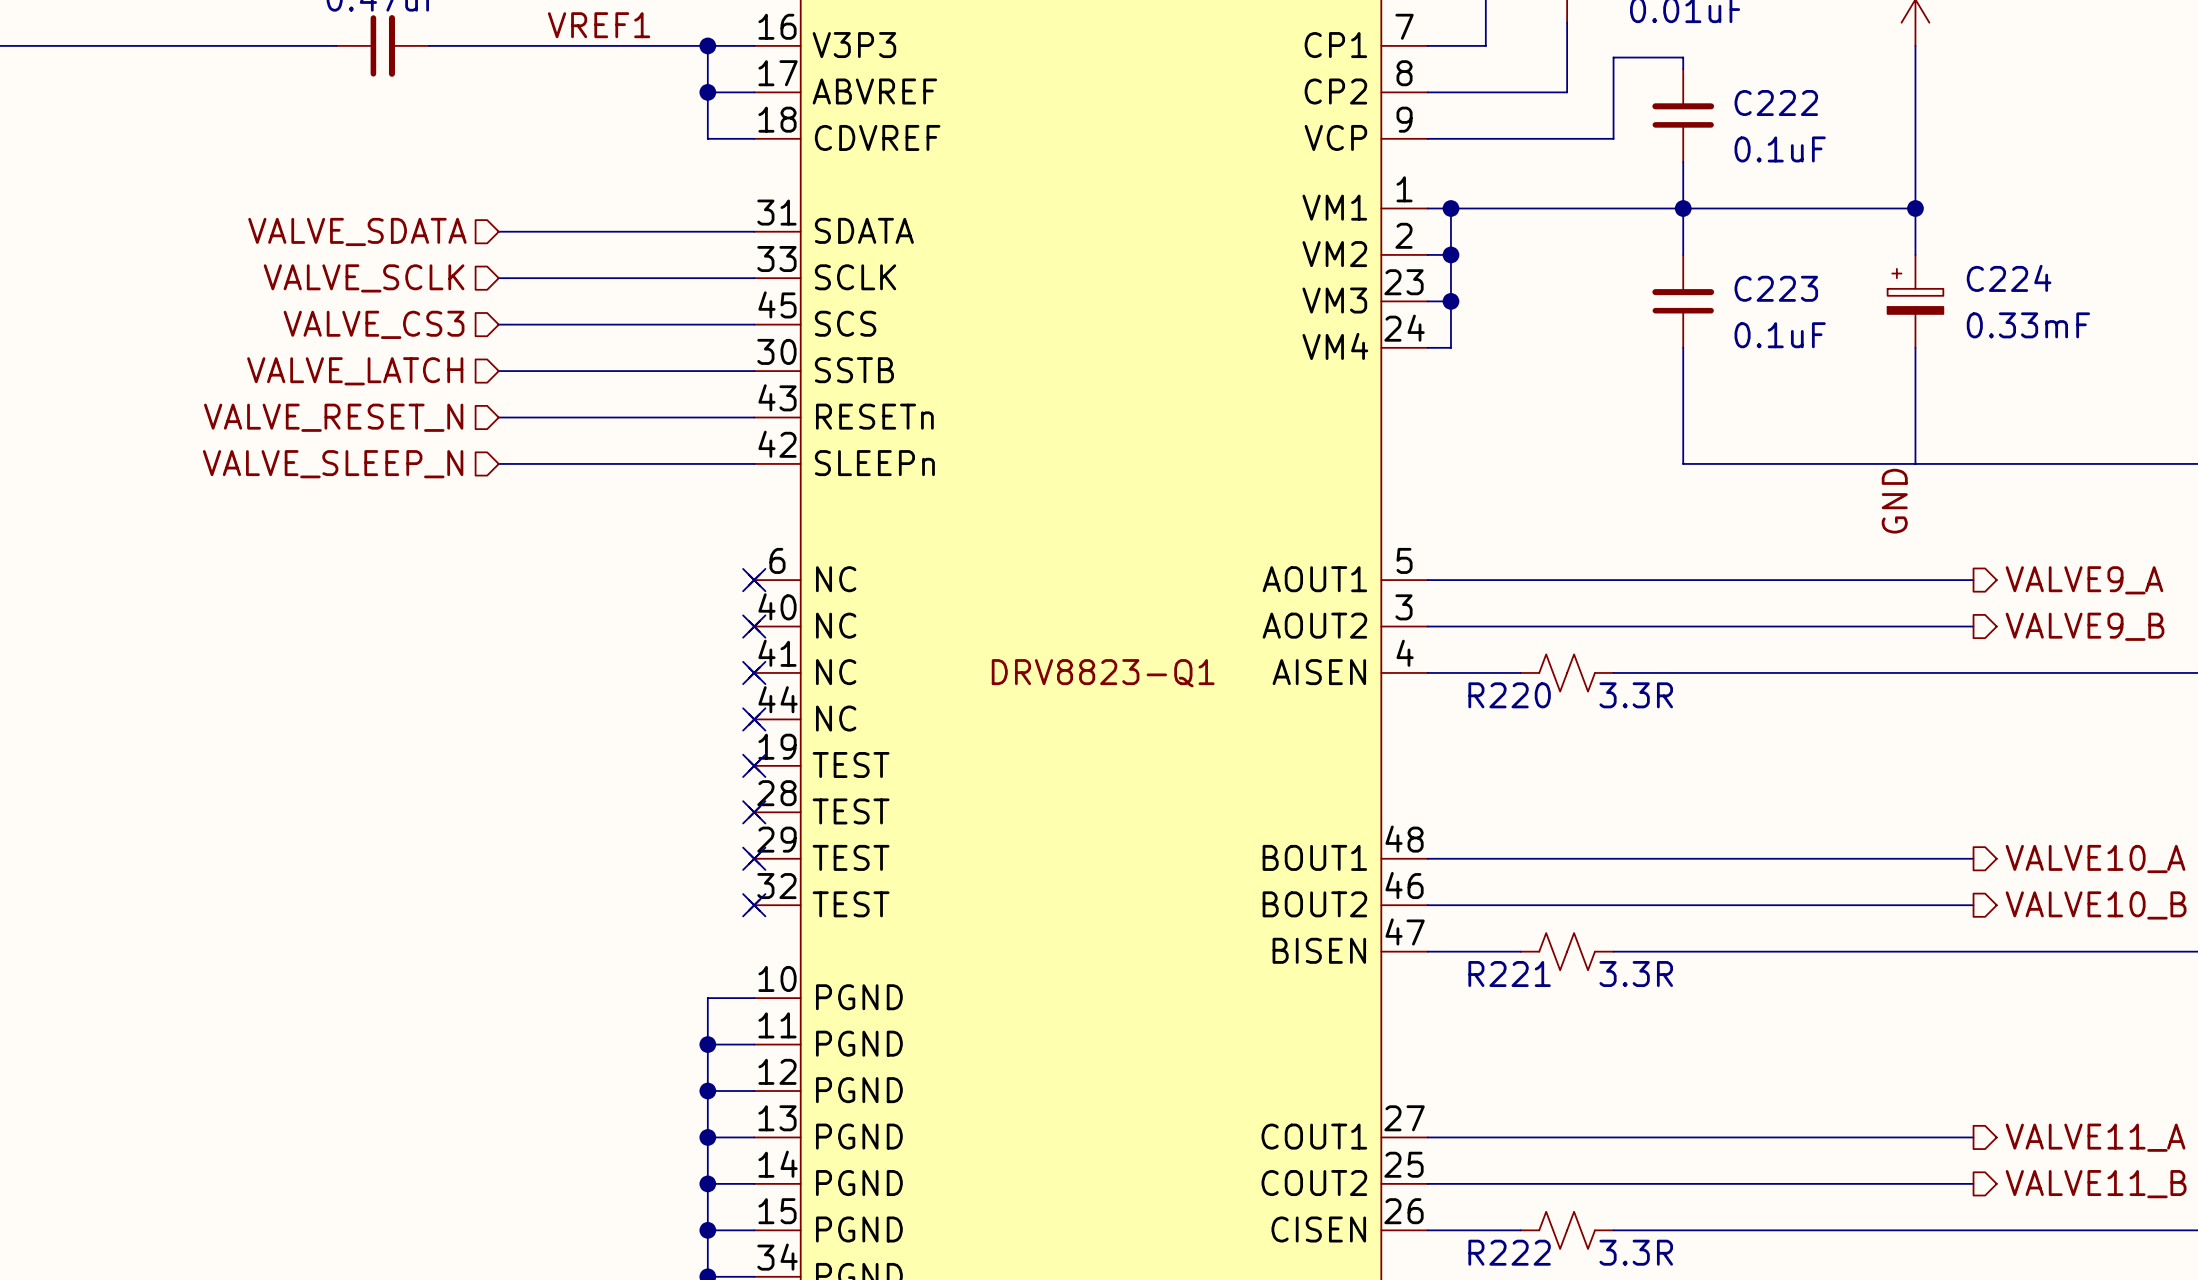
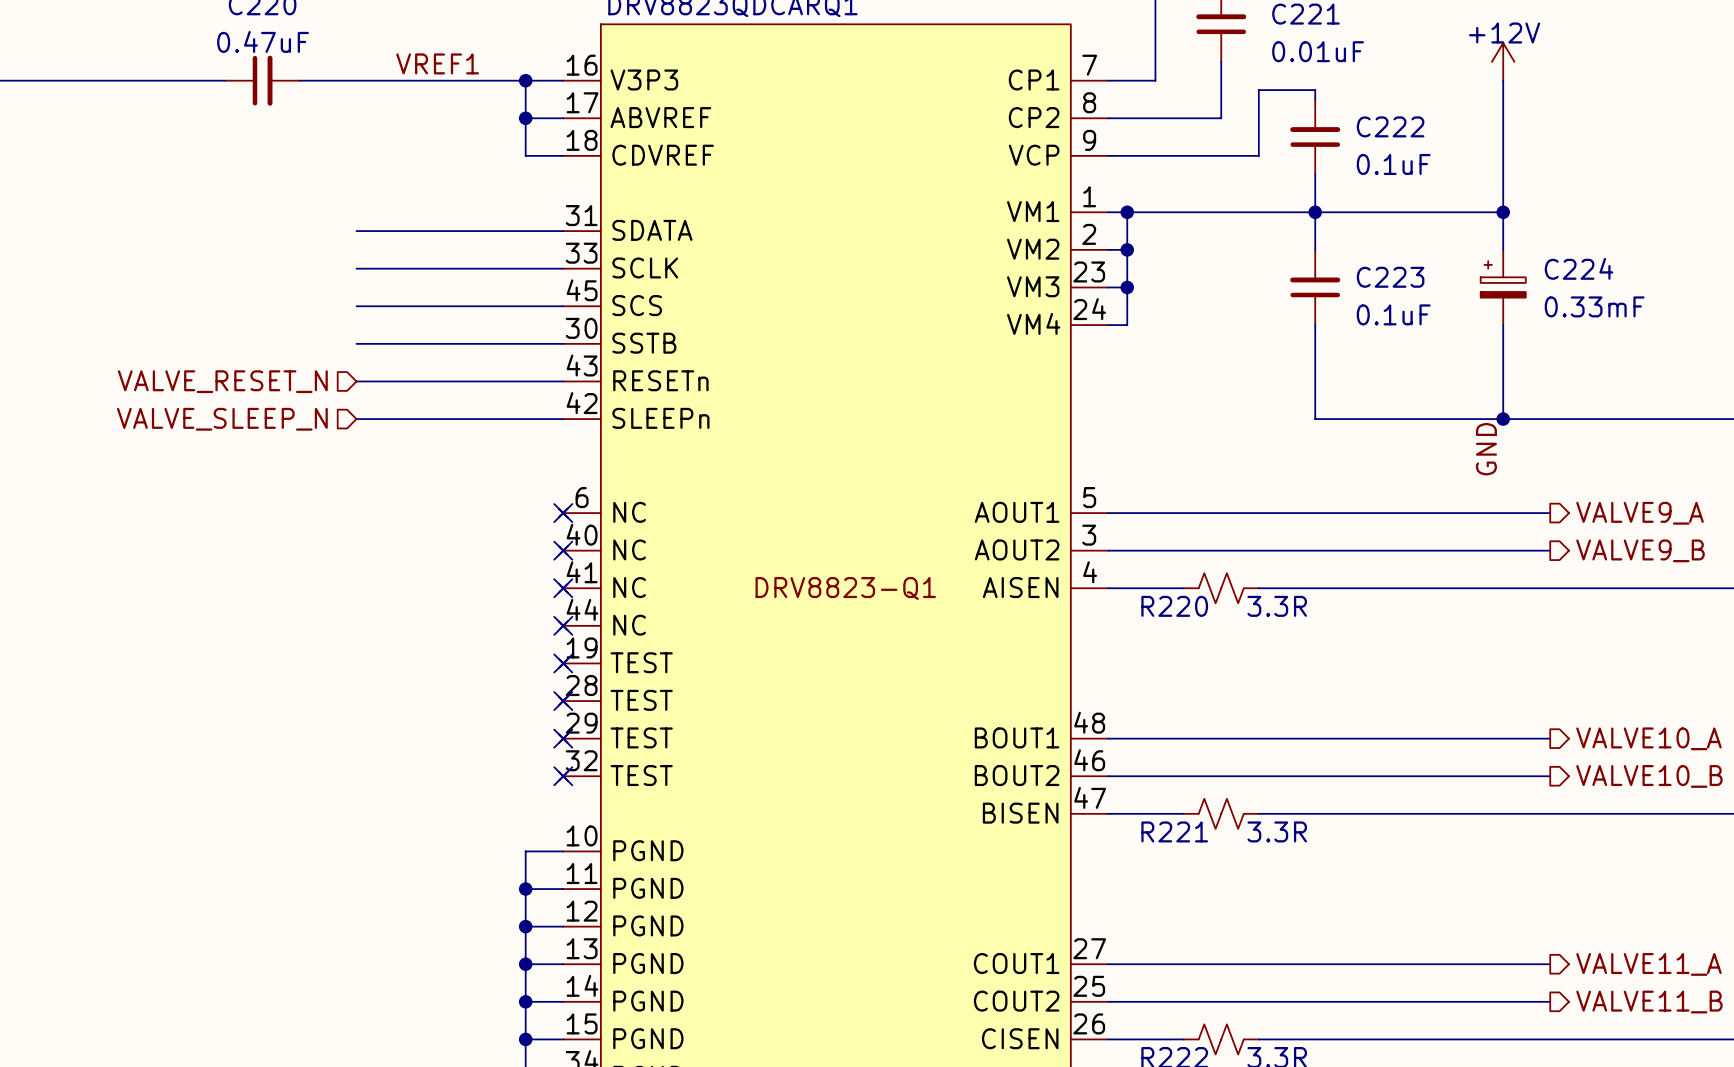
hierarchical label: VALVE_SDATA (357, 231) -> none
hierarchical label: VALVE_SCLK (364, 278) -> none
hierarchical label: VALVE_CS3 (374, 324) -> none
hierarchical label: VALVE_LATCH (355, 371) -> none
junction: none -> (1503, 419)

